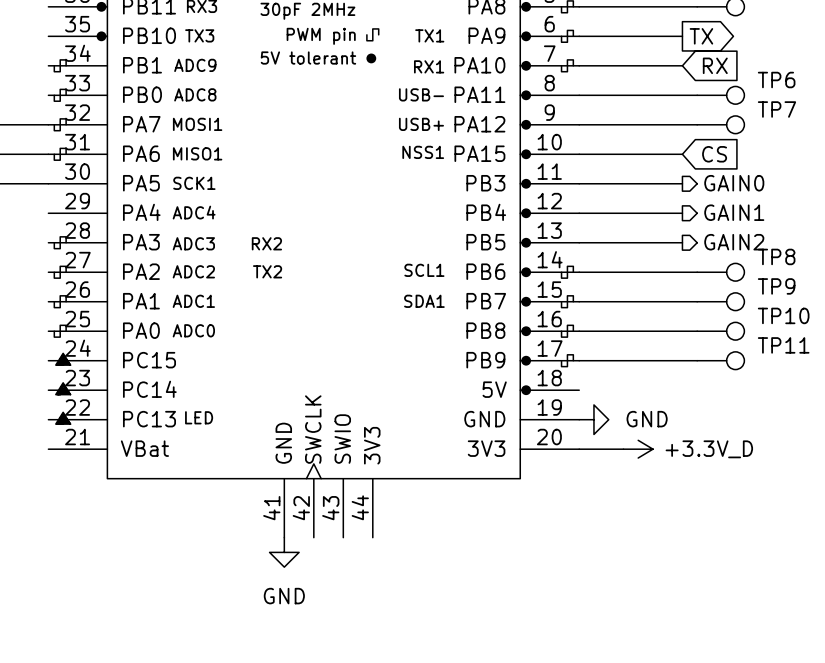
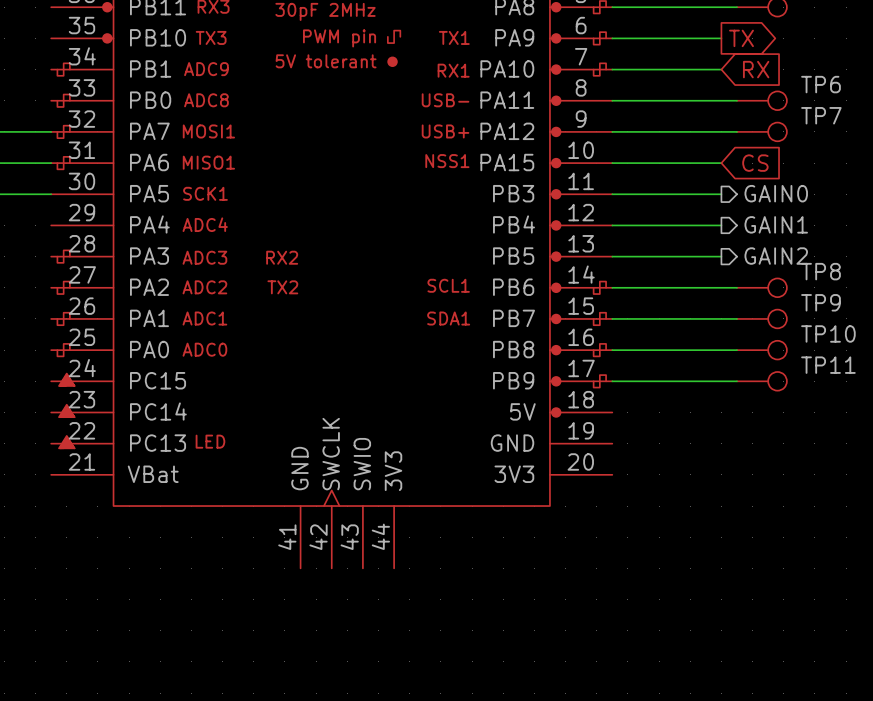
power symbol: GND (593, 419) -> none
wire: (579, 449) (623, 449) -> none
power symbol: +3.3V_D (638, 449) -> none
power symbol: GND (284, 552) -> none

